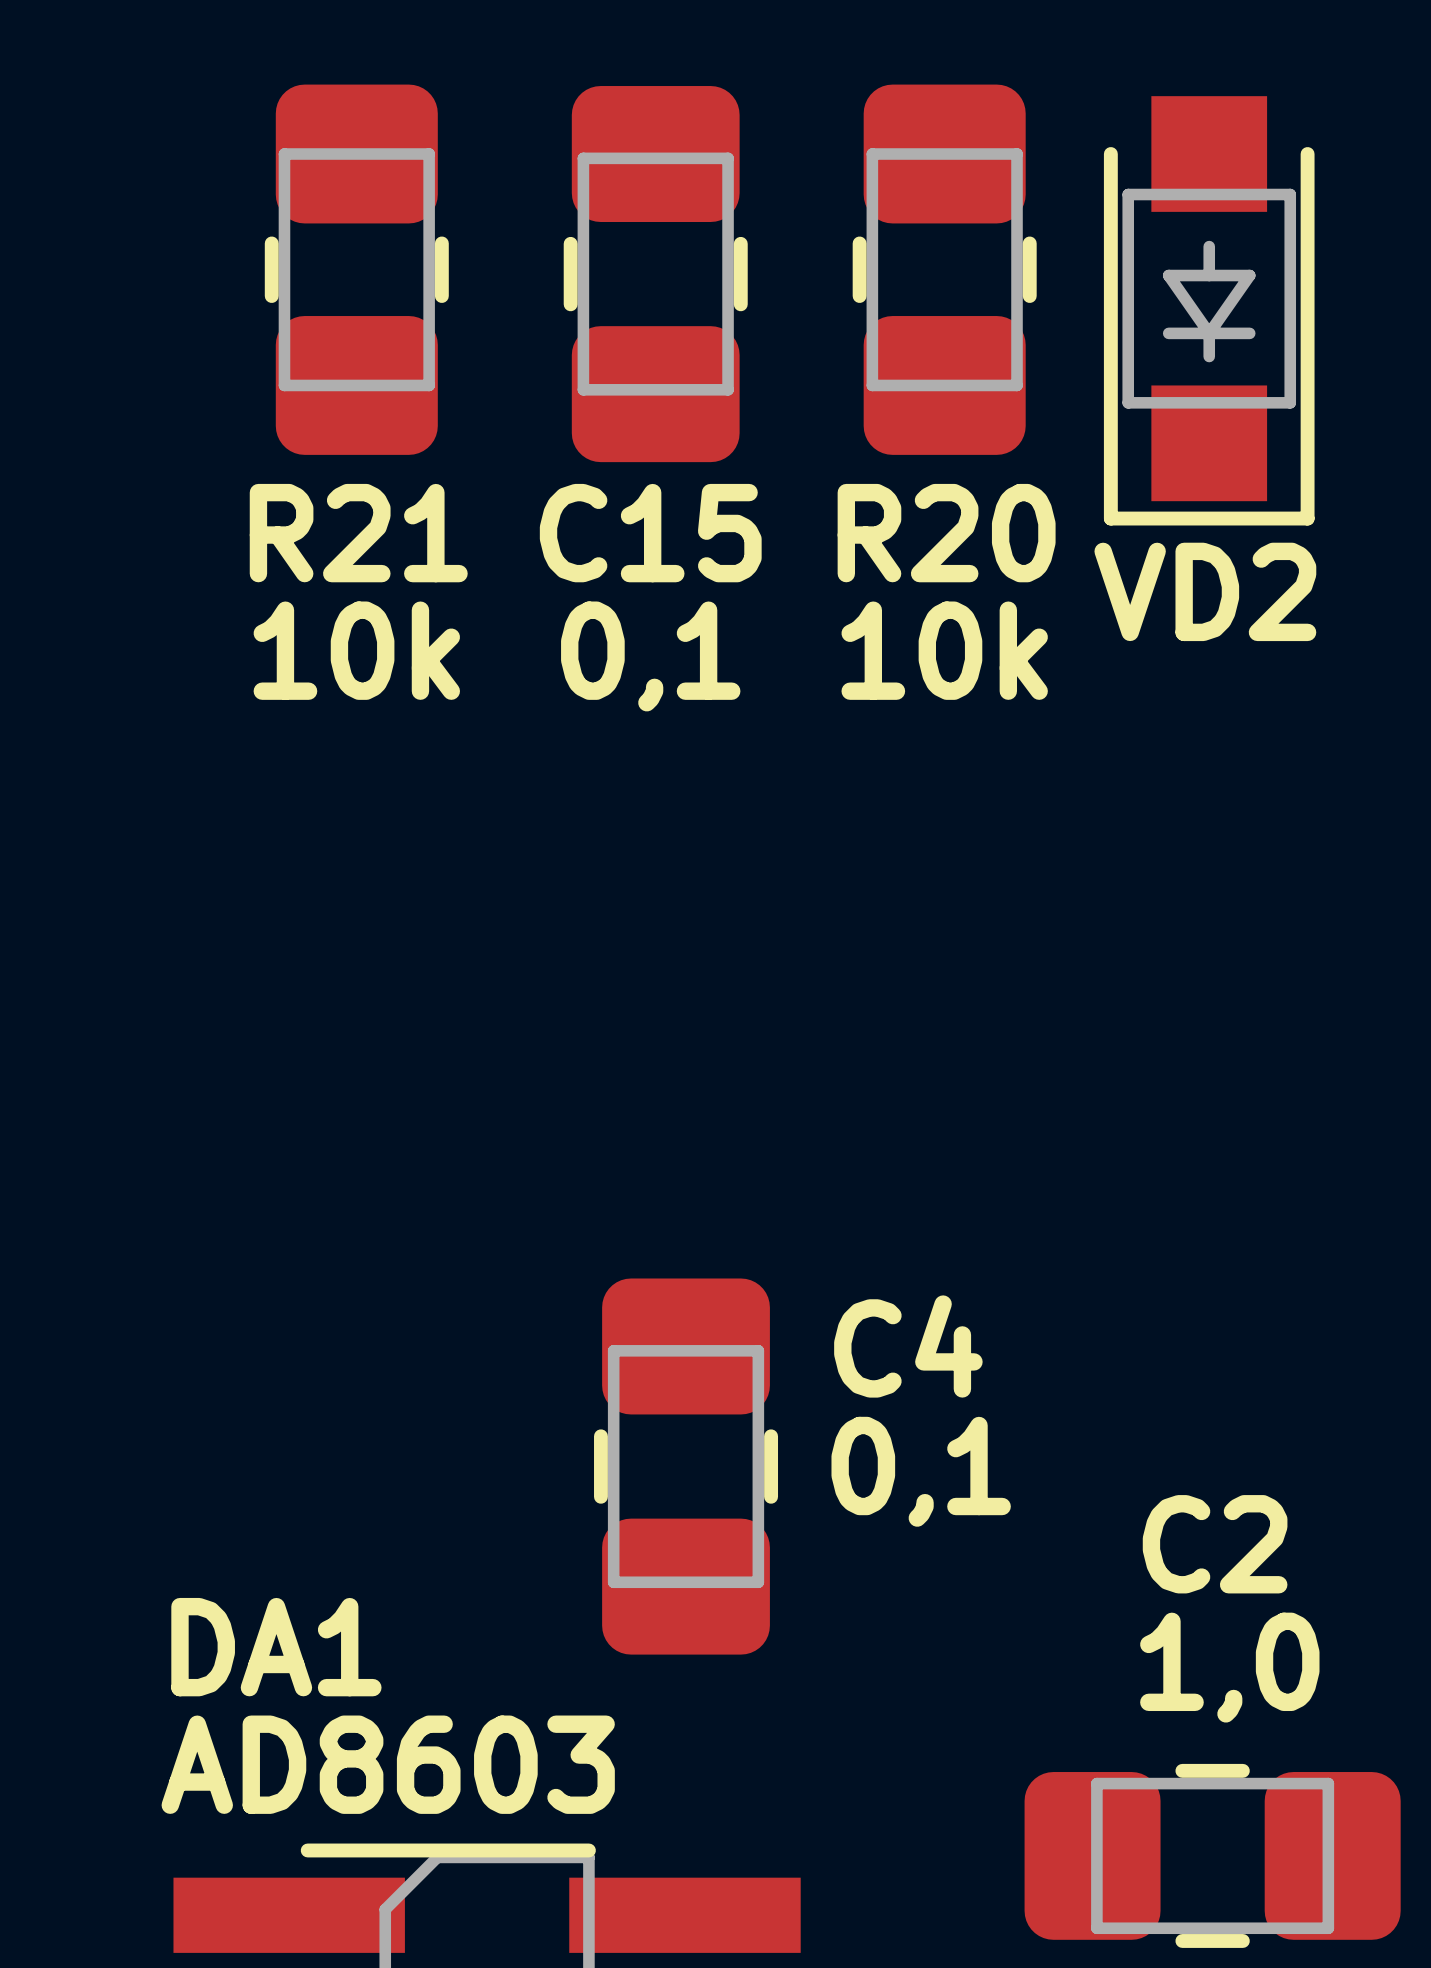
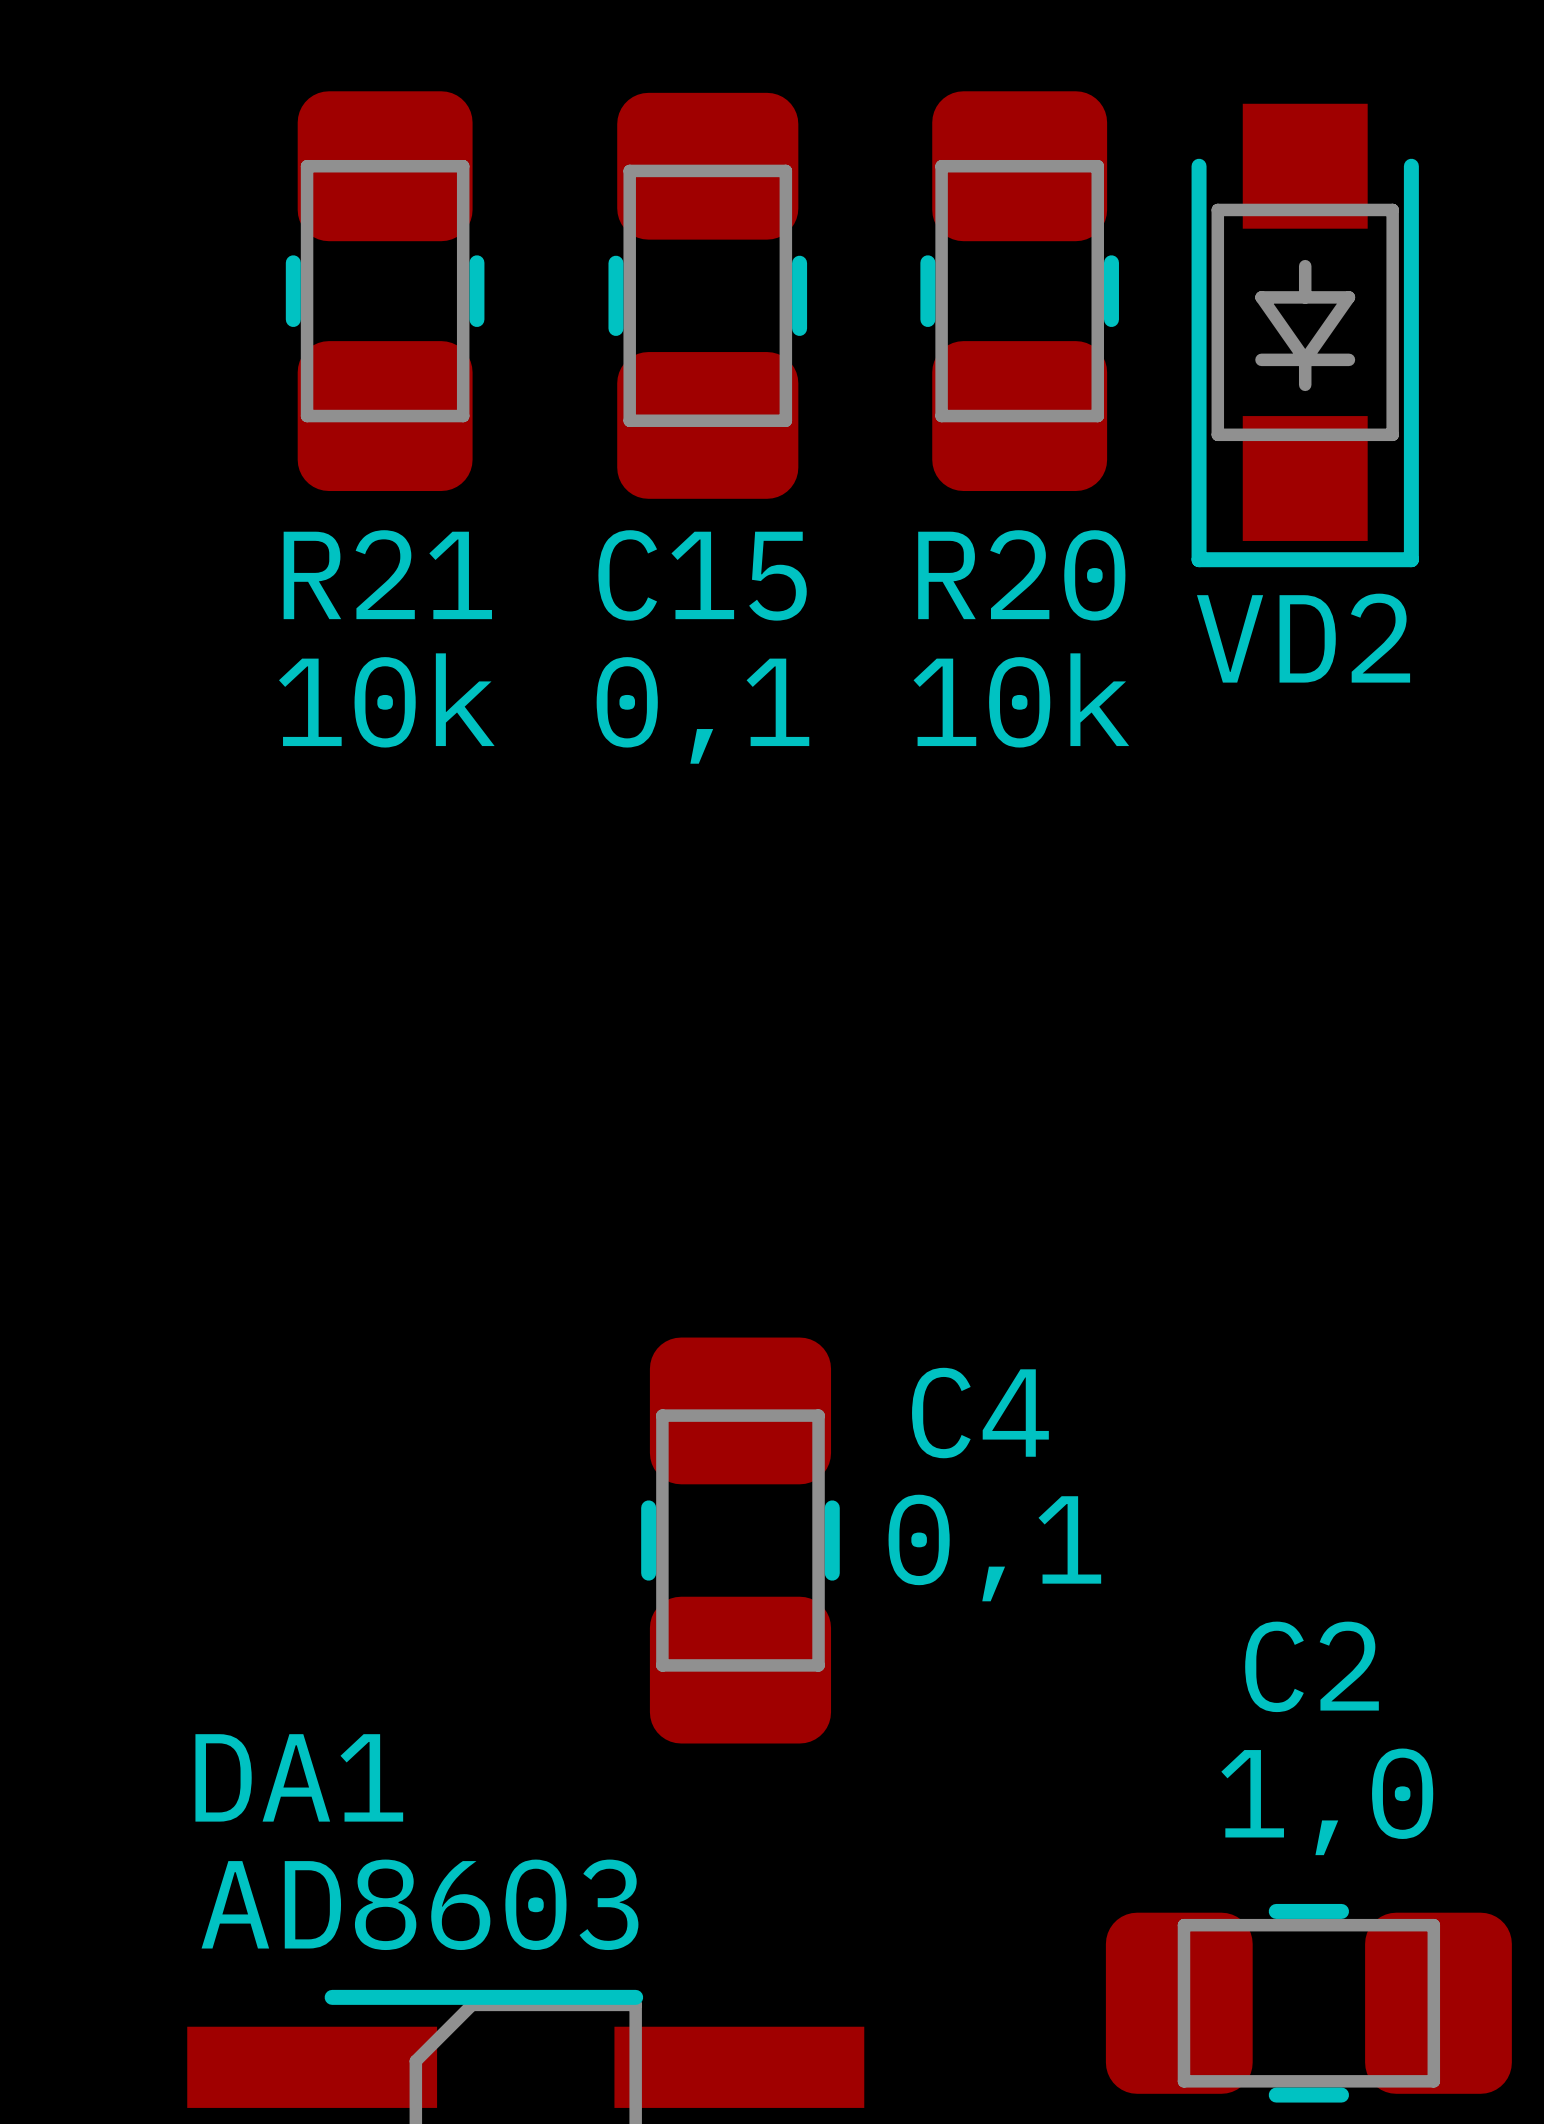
C4 position: (686, 1466) -> (740, 1540)

